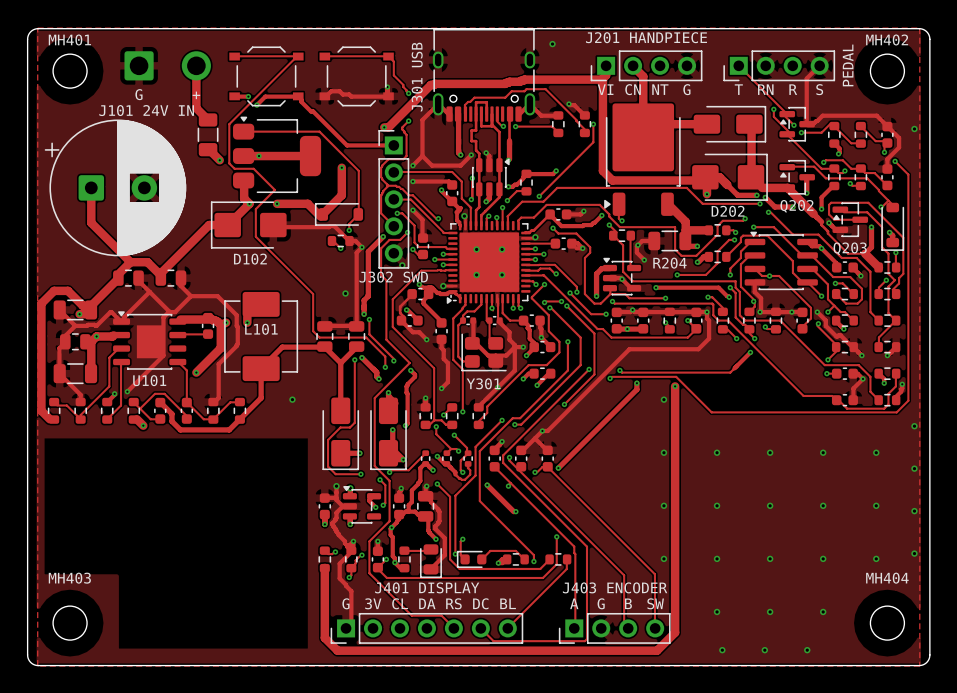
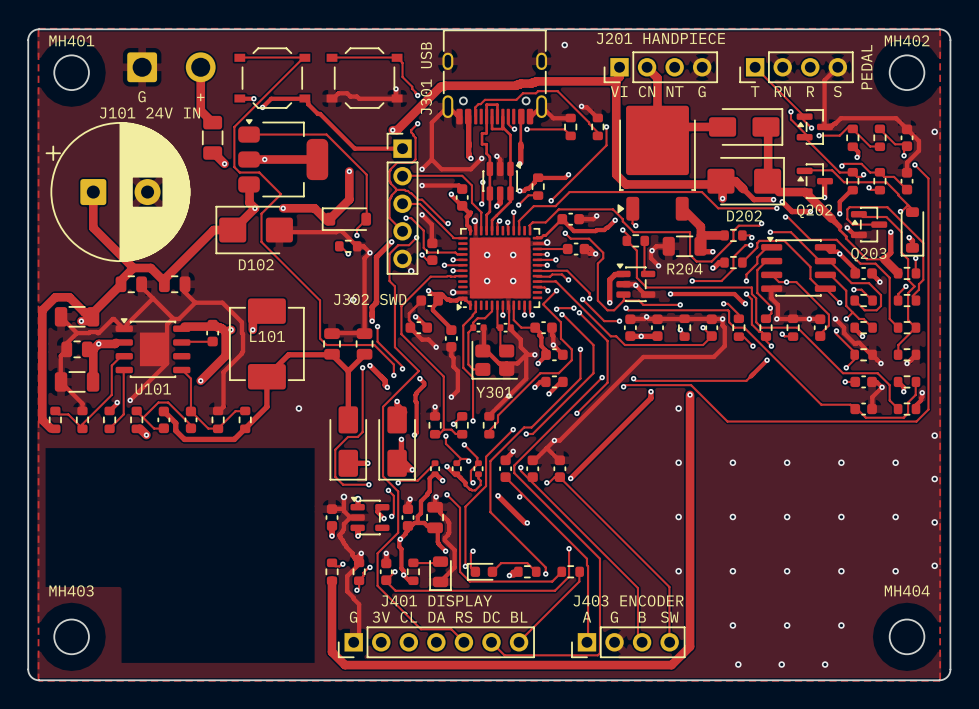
text position: J302 SWD (393, 277) -> J302 SWD (370, 299)

